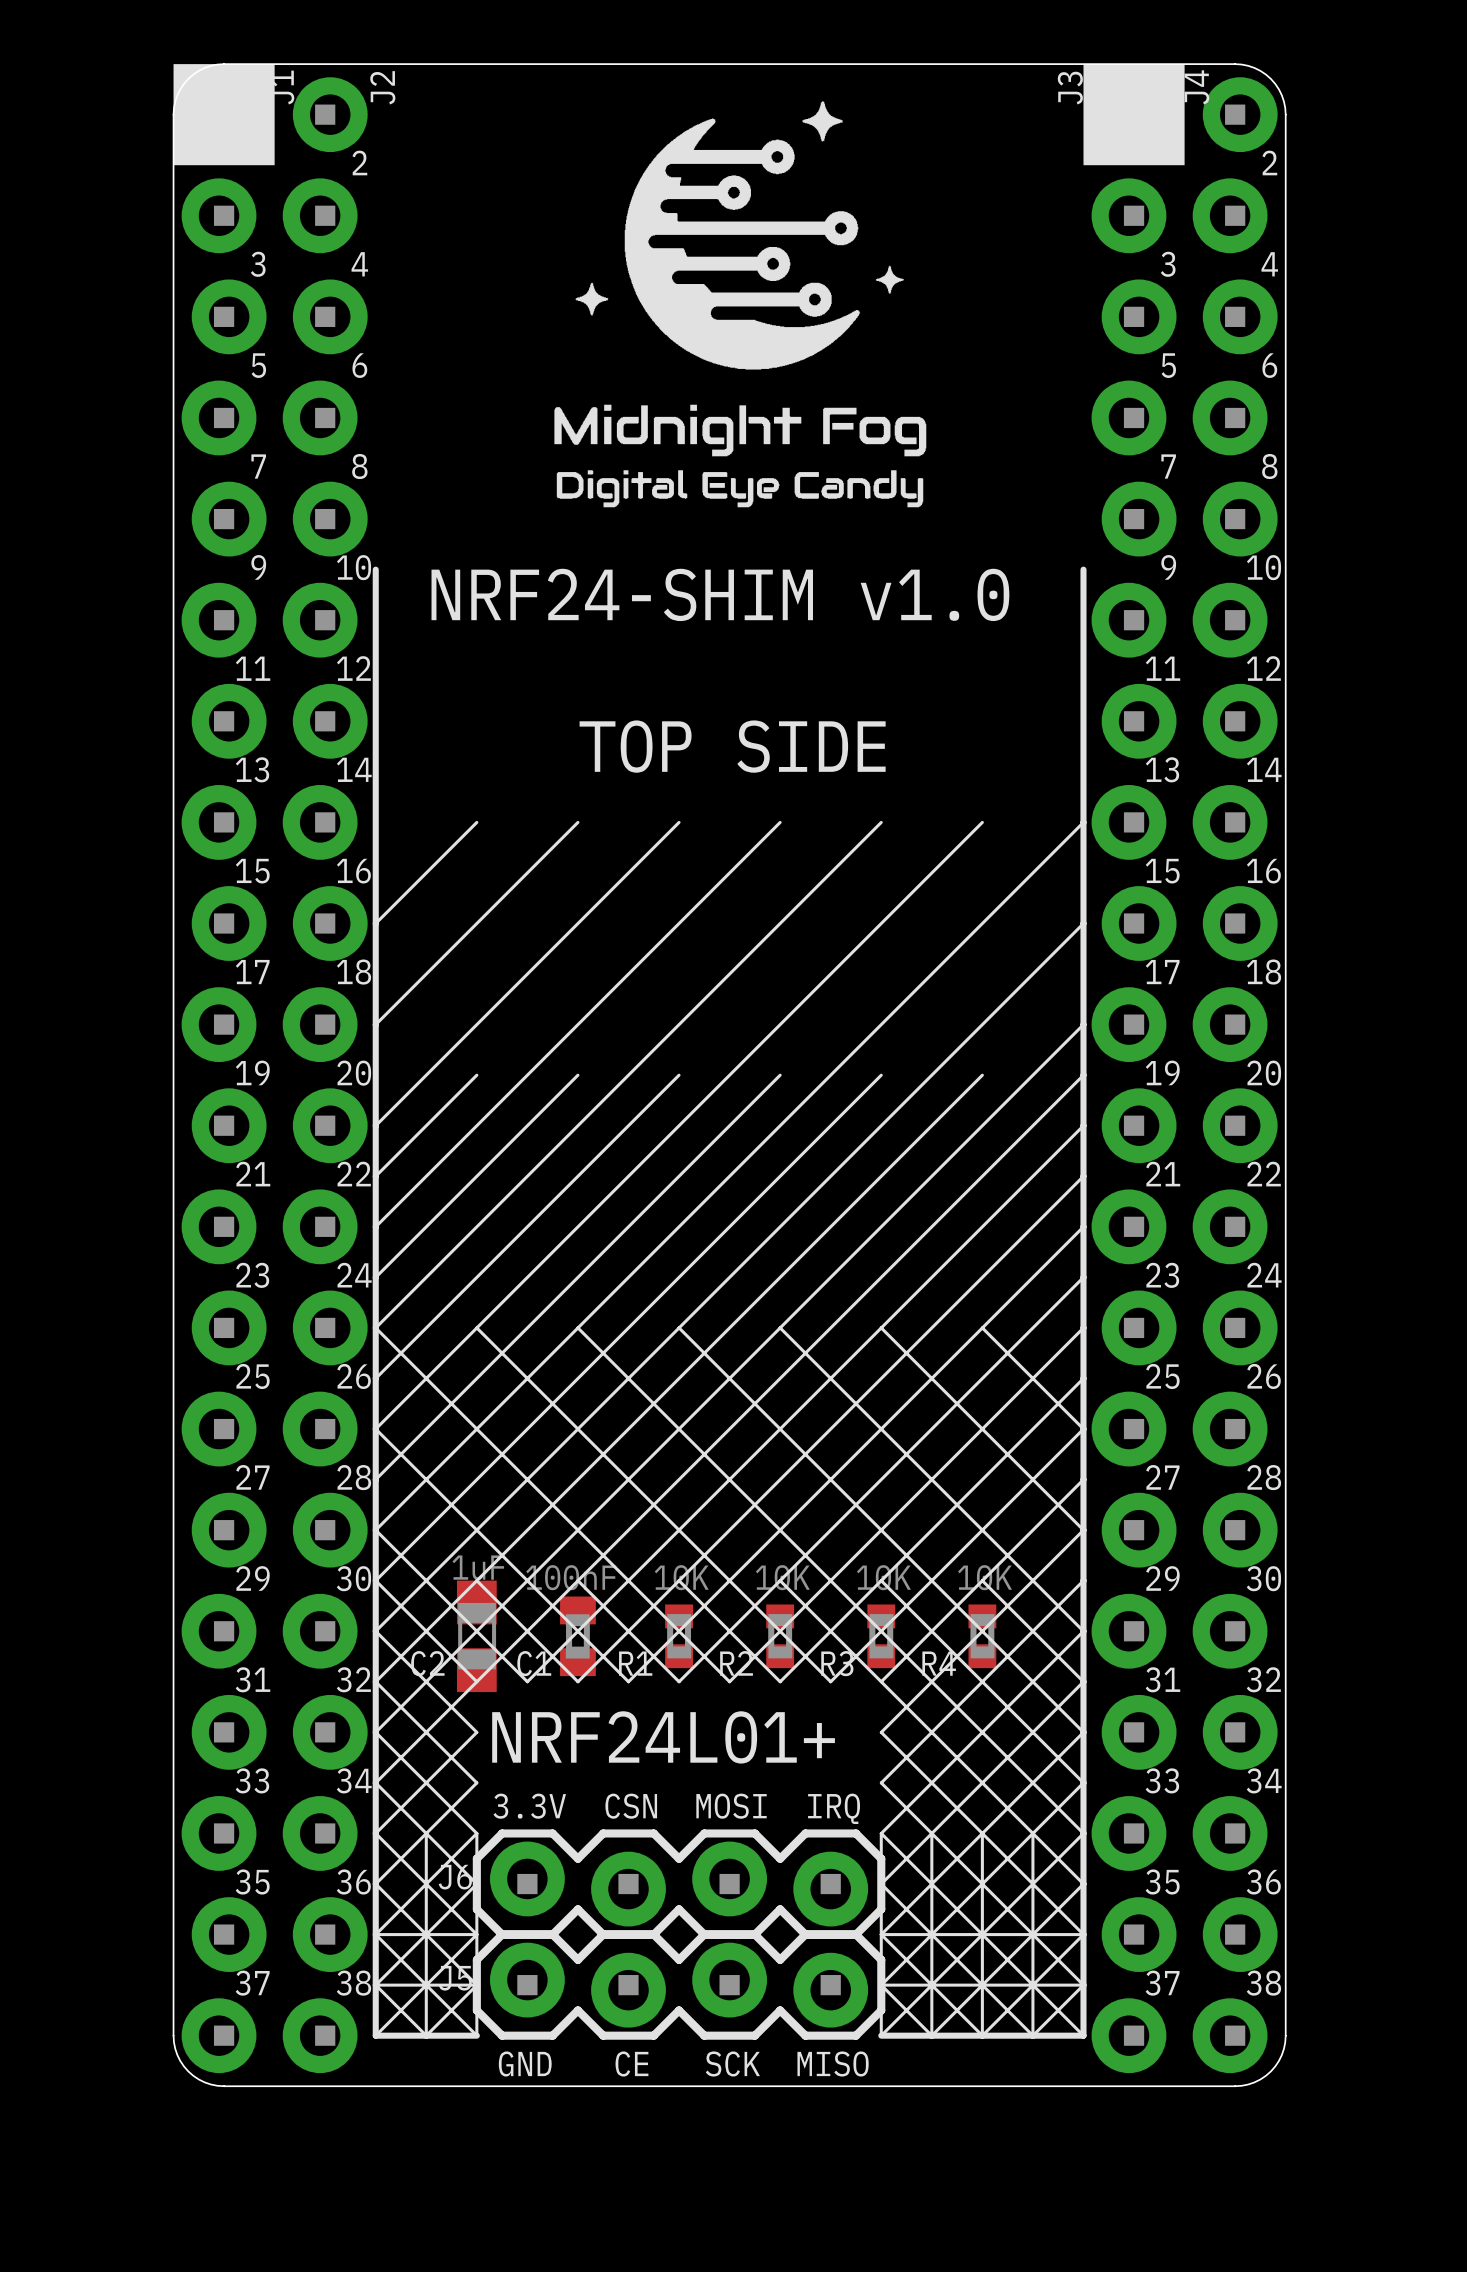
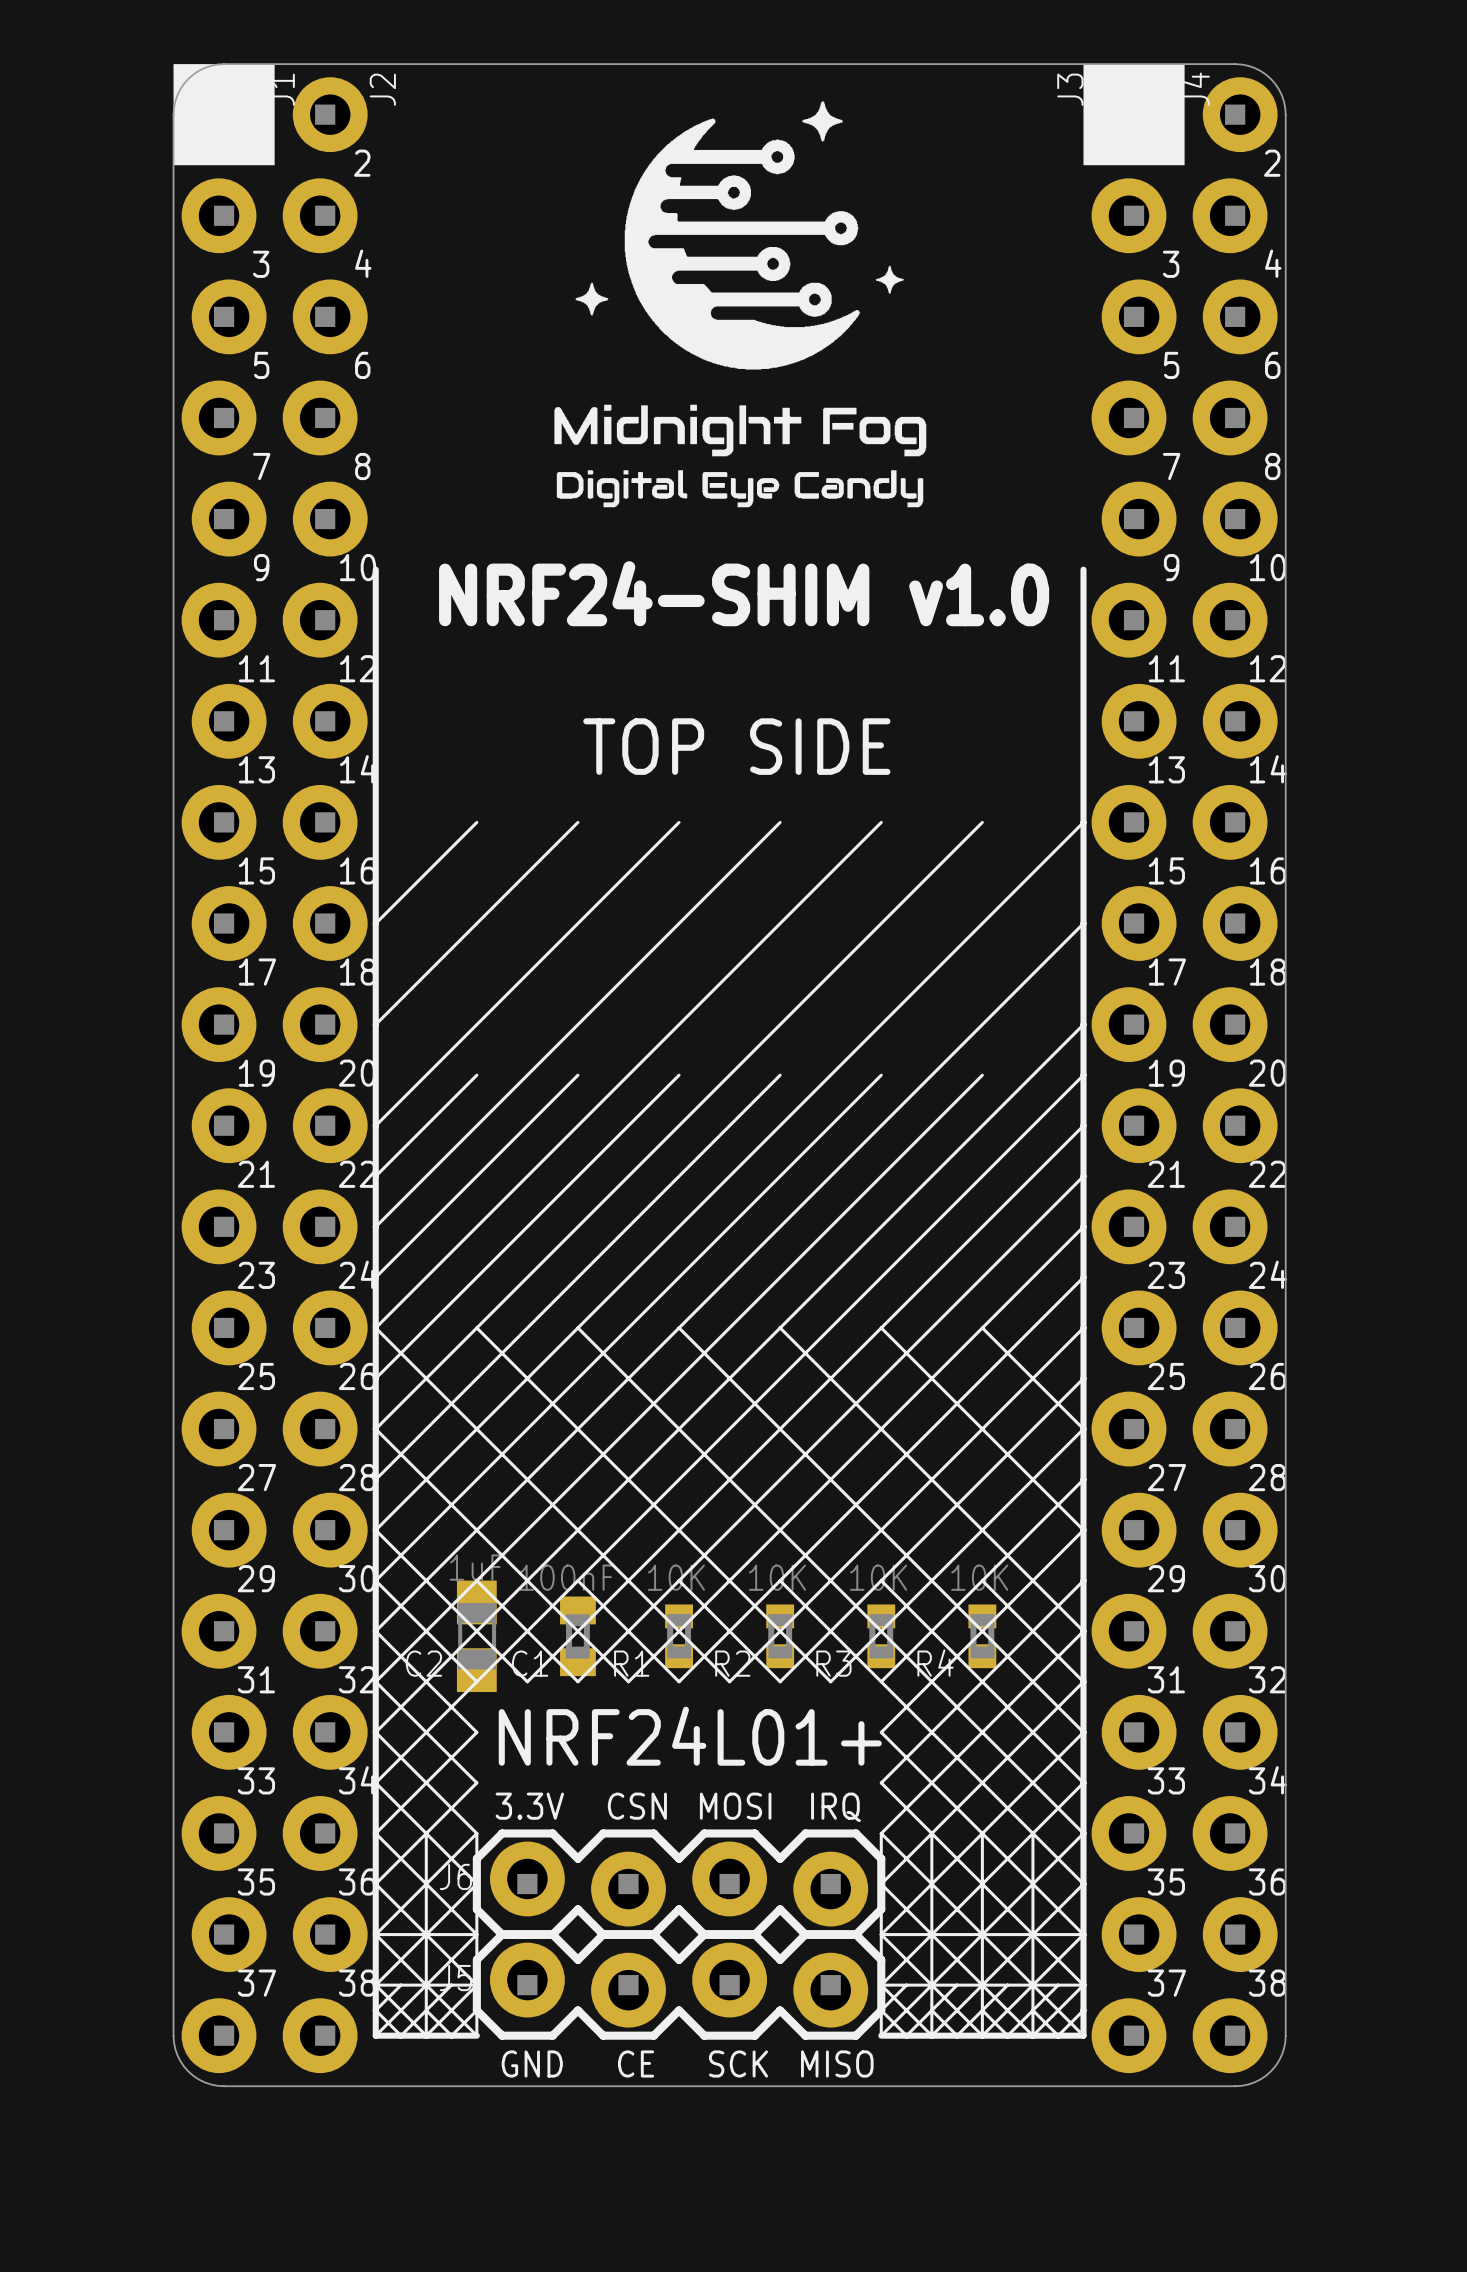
line: none -> (401, 1985) (375, 2010) (401, 2035) (451, 1985)
line: none -> (906, 1985) (881, 2010) (906, 2035) (957, 1985)
line: none -> (1007, 1985) (957, 2035) (931, 2010)
line: none -> (1058, 1985) (1007, 2035) (982, 2010)
line: none -> (426, 2010) (451, 2035) (476, 2010)
line: none -> (1032, 2010) (1058, 2035) (1083, 2010)

